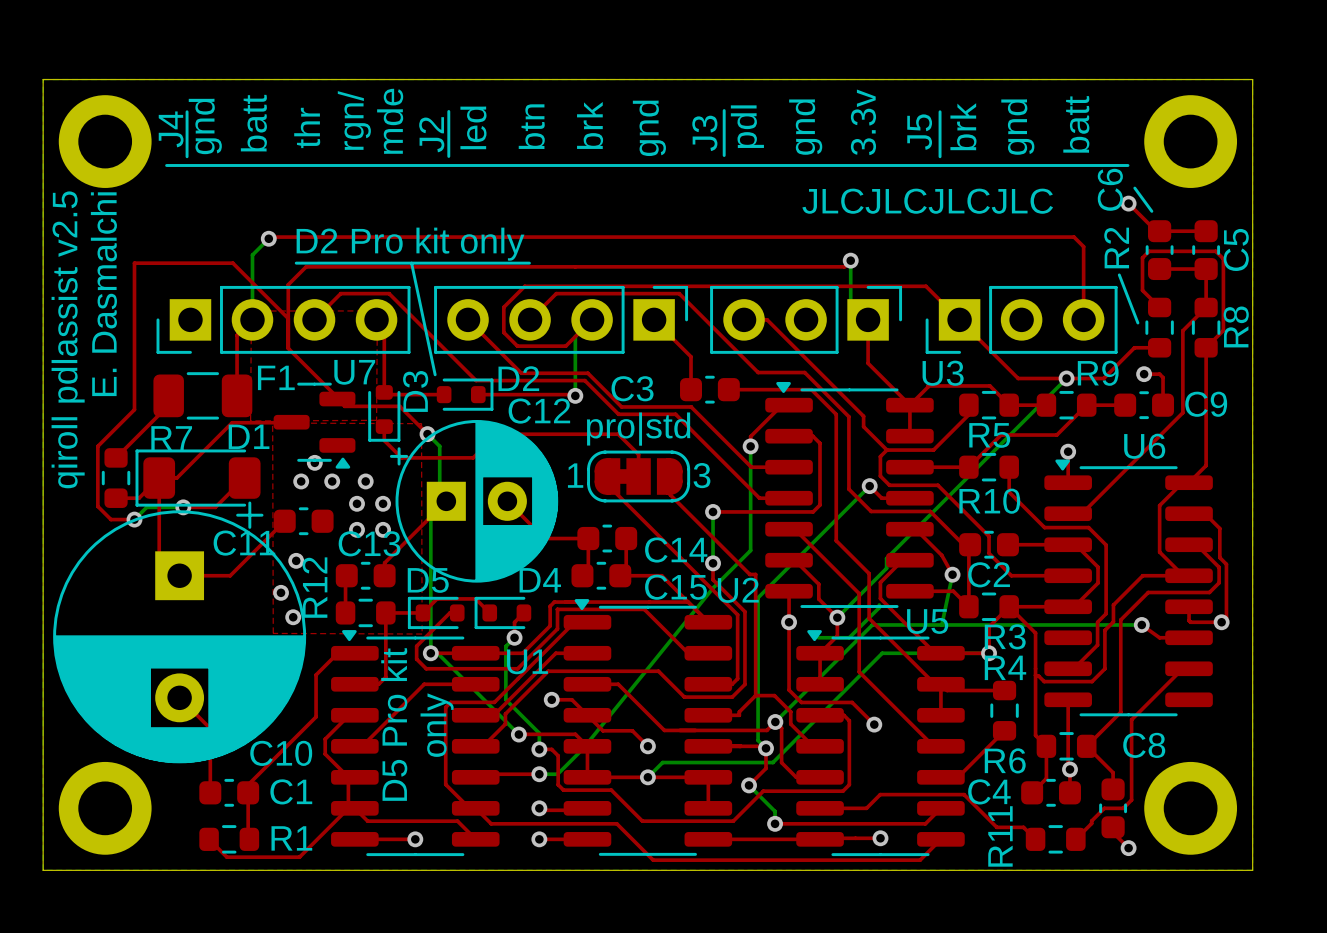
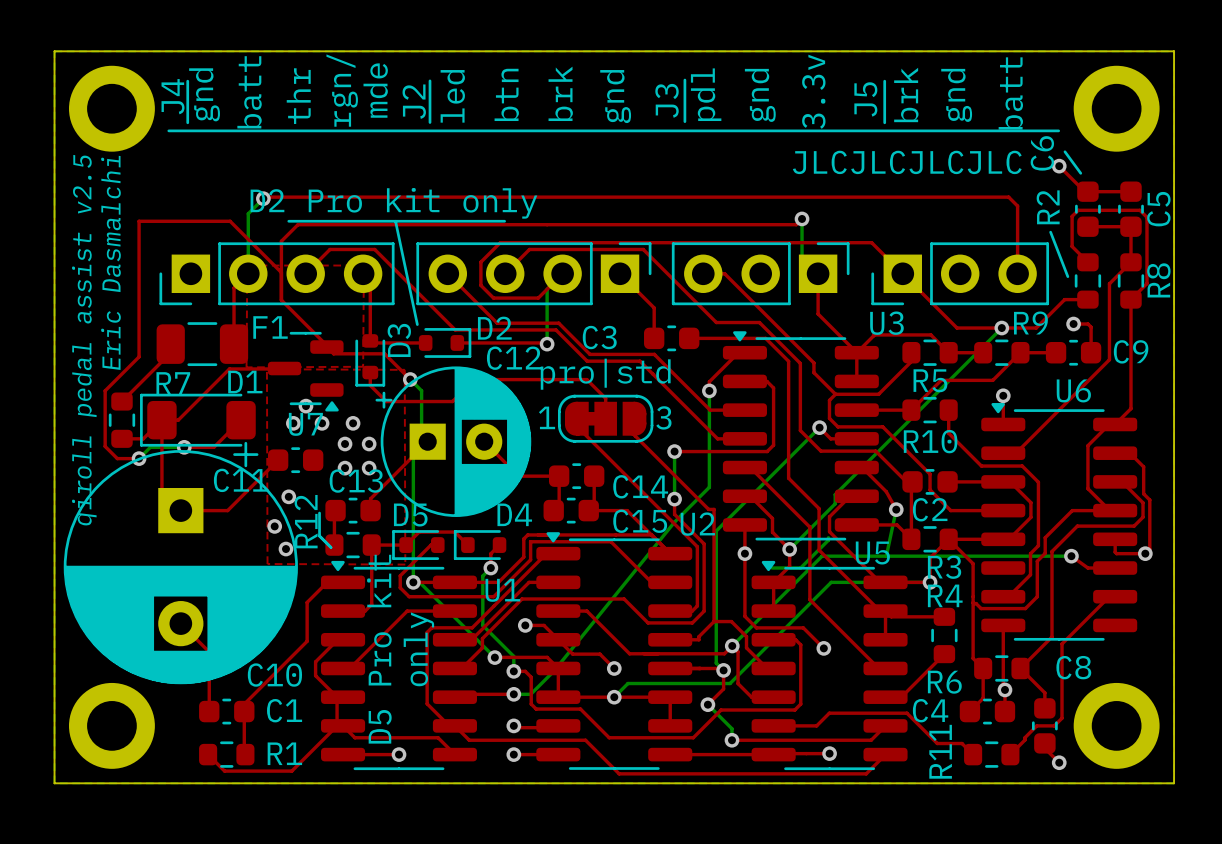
text position: JLCJLCJLCJLC (927, 201) -> JLCJLCJLCJLC (907, 162)
text: E. Dasmalchi (103, 294) -> Eric Dasmalchi (110, 262)
text: qiroll pdlassist v2.5 (68, 339) -> qiroll pedal assist v2.5 (84, 340)
U7 name position: U7 (354, 372) -> U7 (305, 424)
line: none -> (319, 513) (319, 536) (331, 547)

